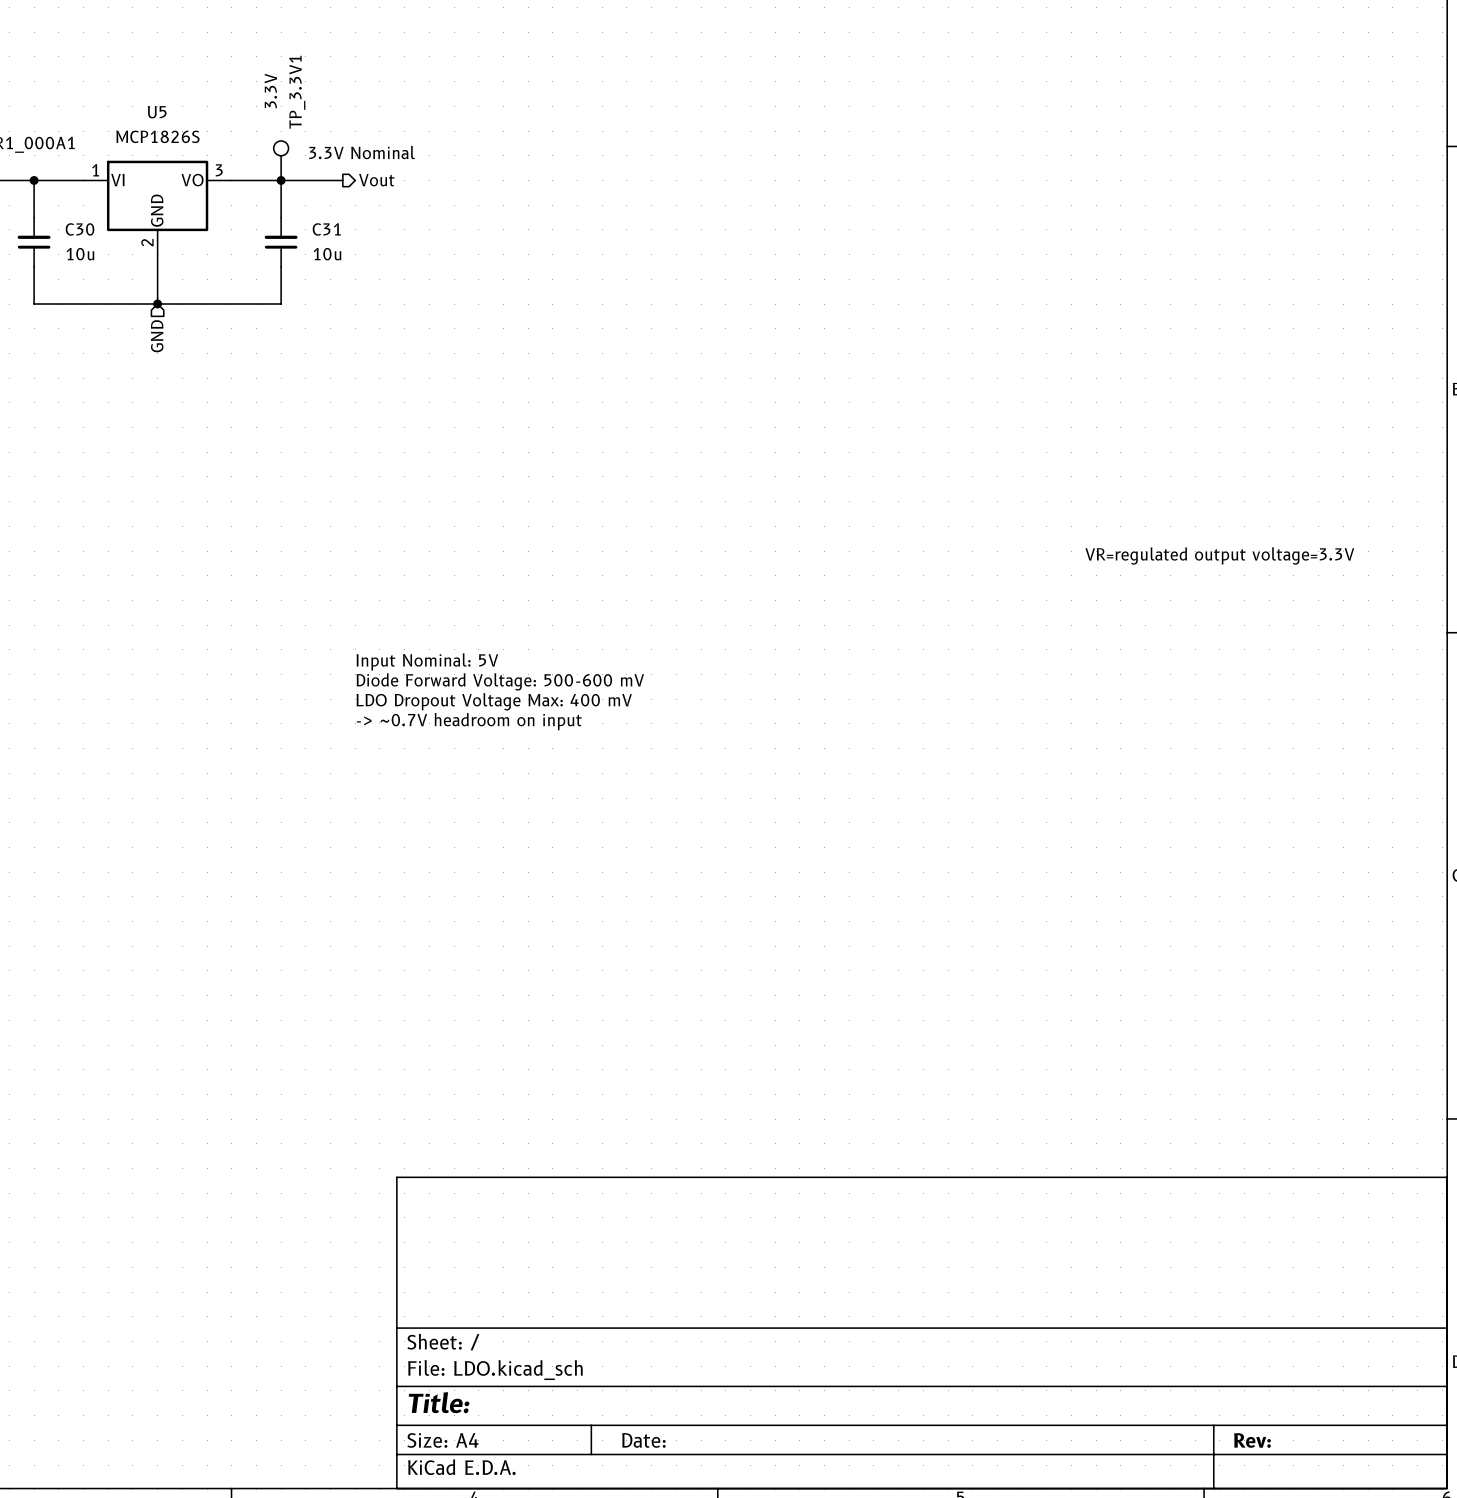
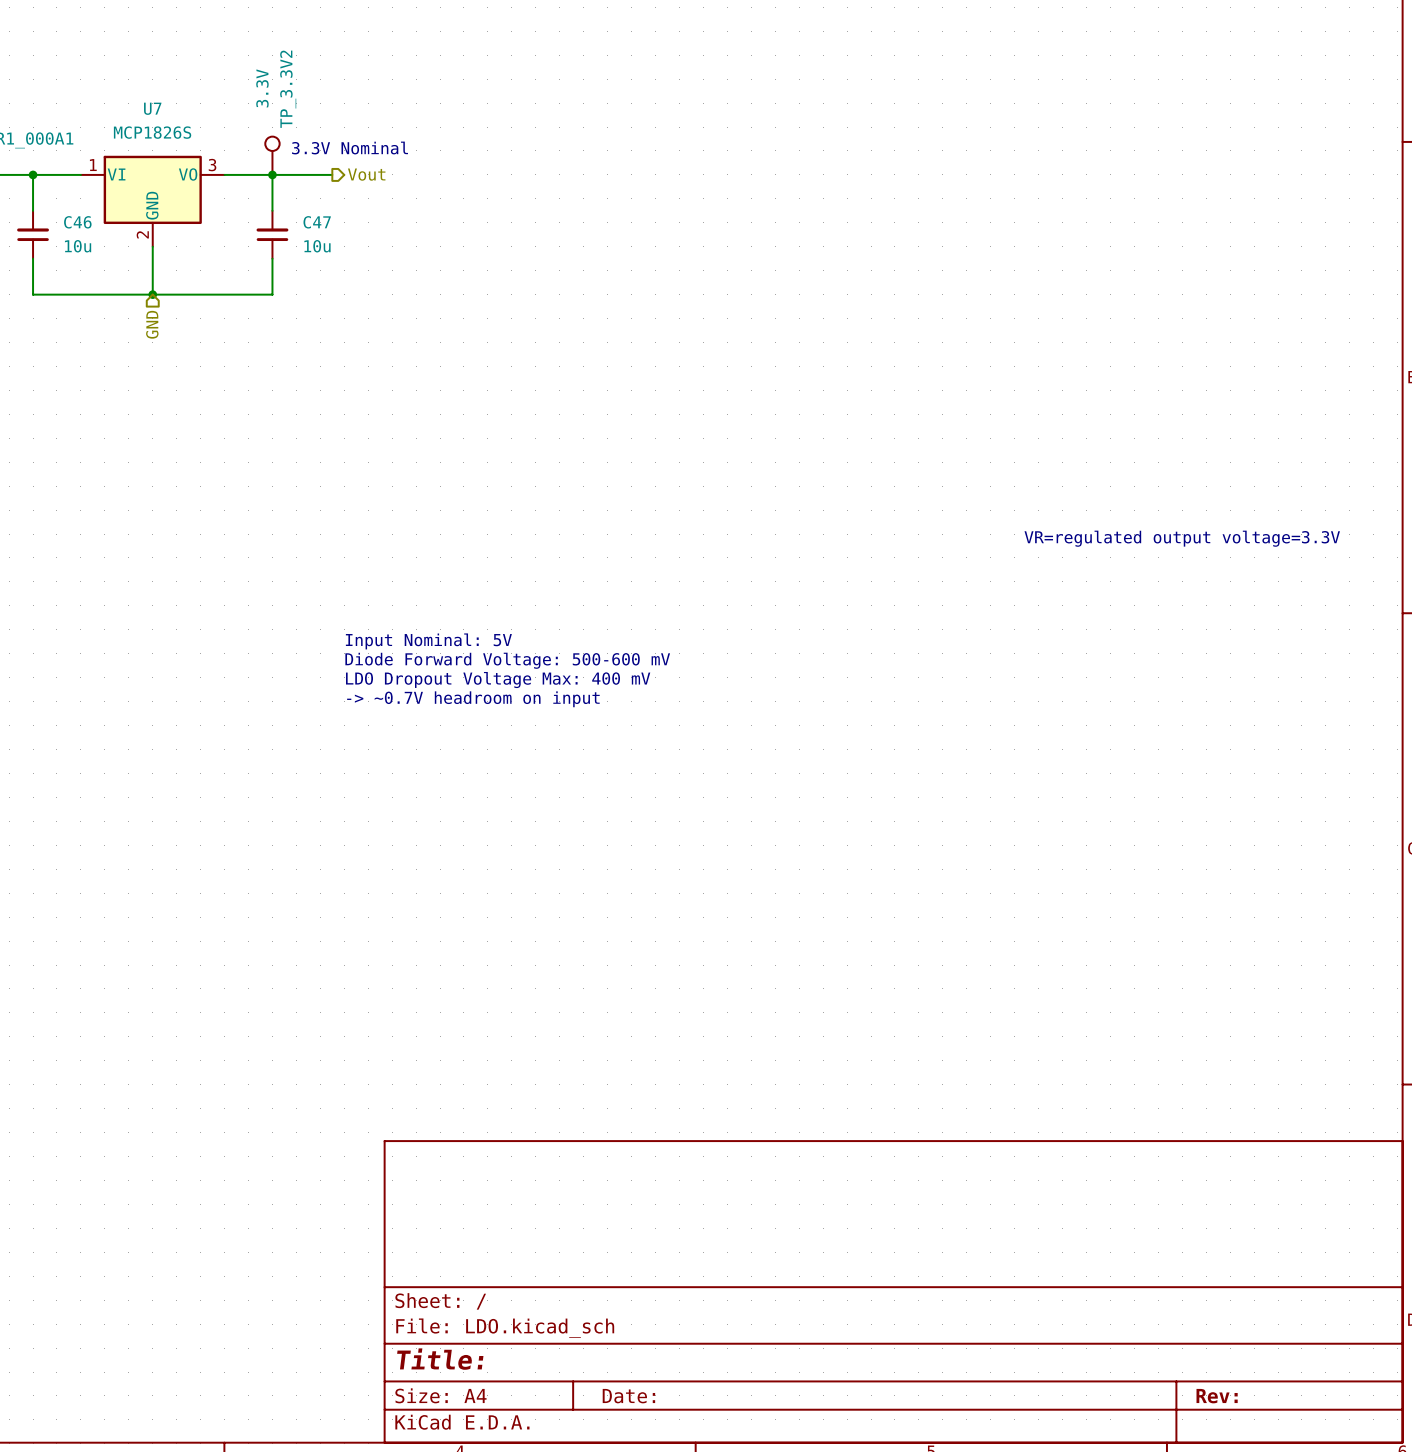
TP_3.3V1 name: TP_3.3V1 (297, 92) -> TP_3.3V2 (288, 89)
U5 name: U5 (157, 112) -> U7 (152, 108)
C30 name: C30 (80, 229) -> C46 (77, 222)
C31 name: C31 (326, 229) -> C47 (317, 222)

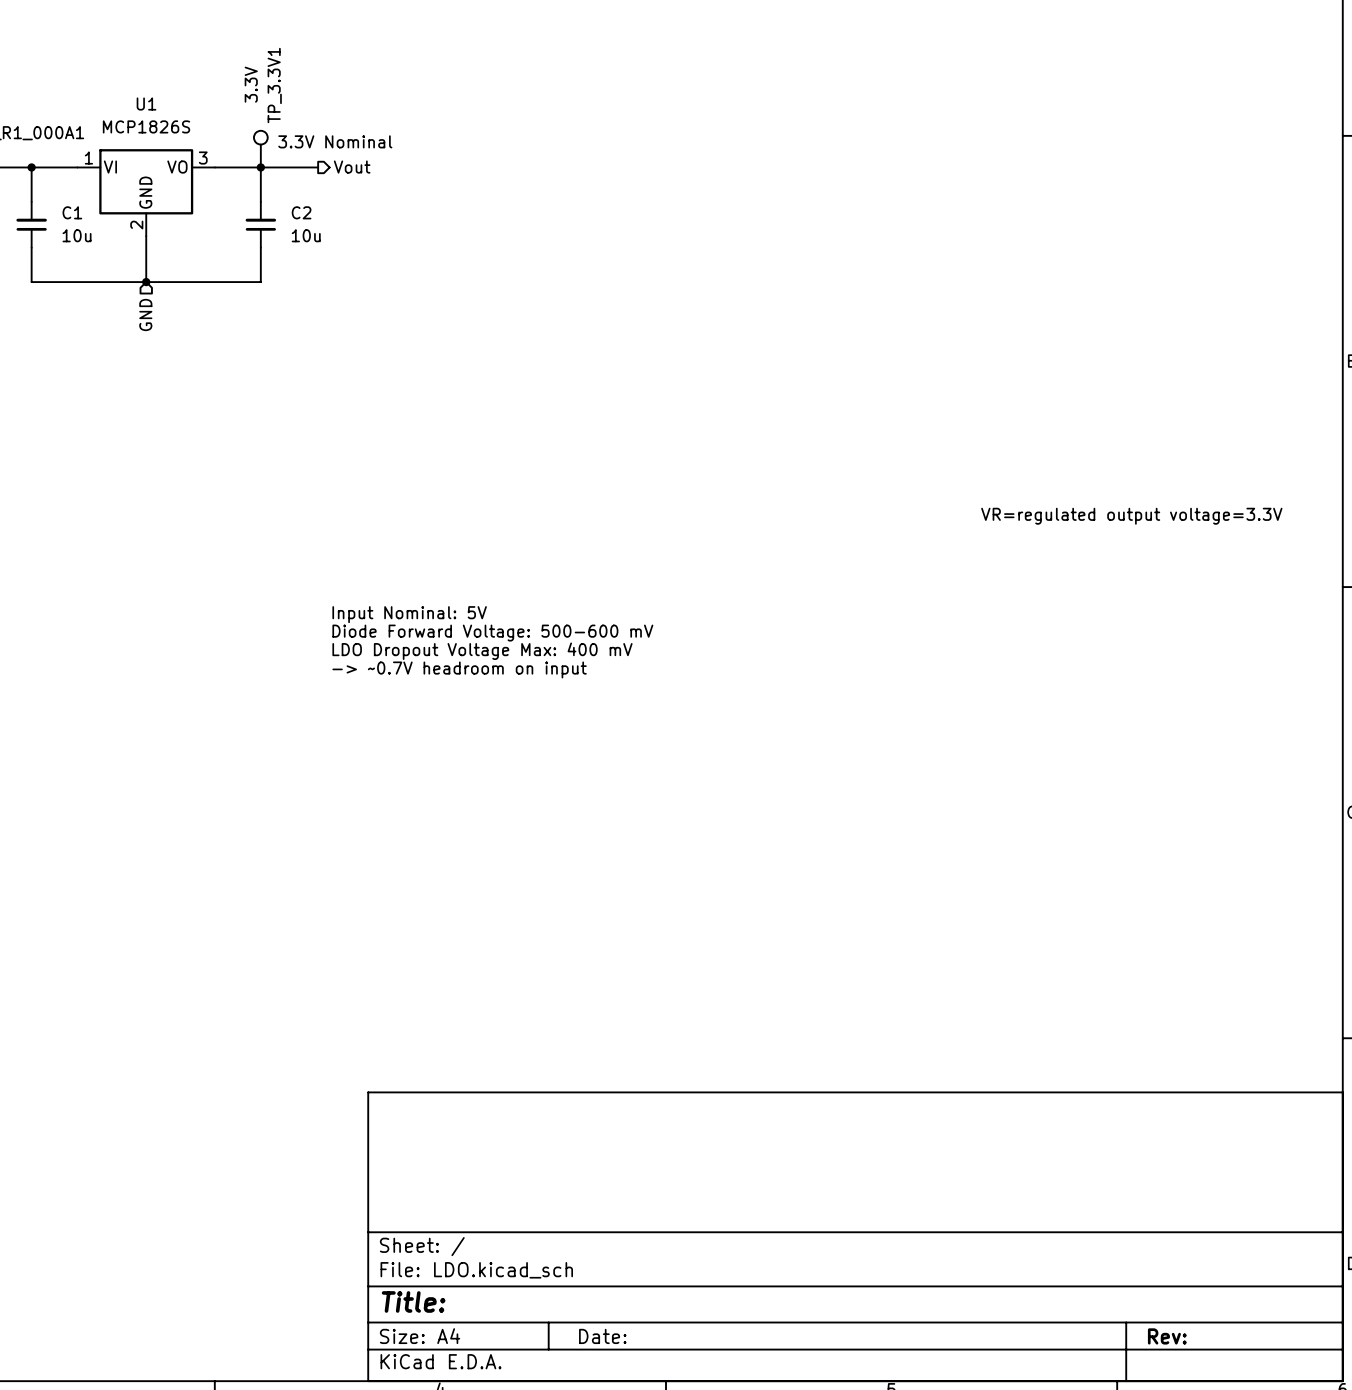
TP_3.3V2 name: TP_3.3V2 (288, 89) -> TP_3.3V1 (274, 85)
U7 name: U7 (152, 108) -> U1 (146, 104)
C46 name: C46 (77, 222) -> C1 (72, 212)
C47 name: C47 (317, 222) -> C2 (301, 212)

